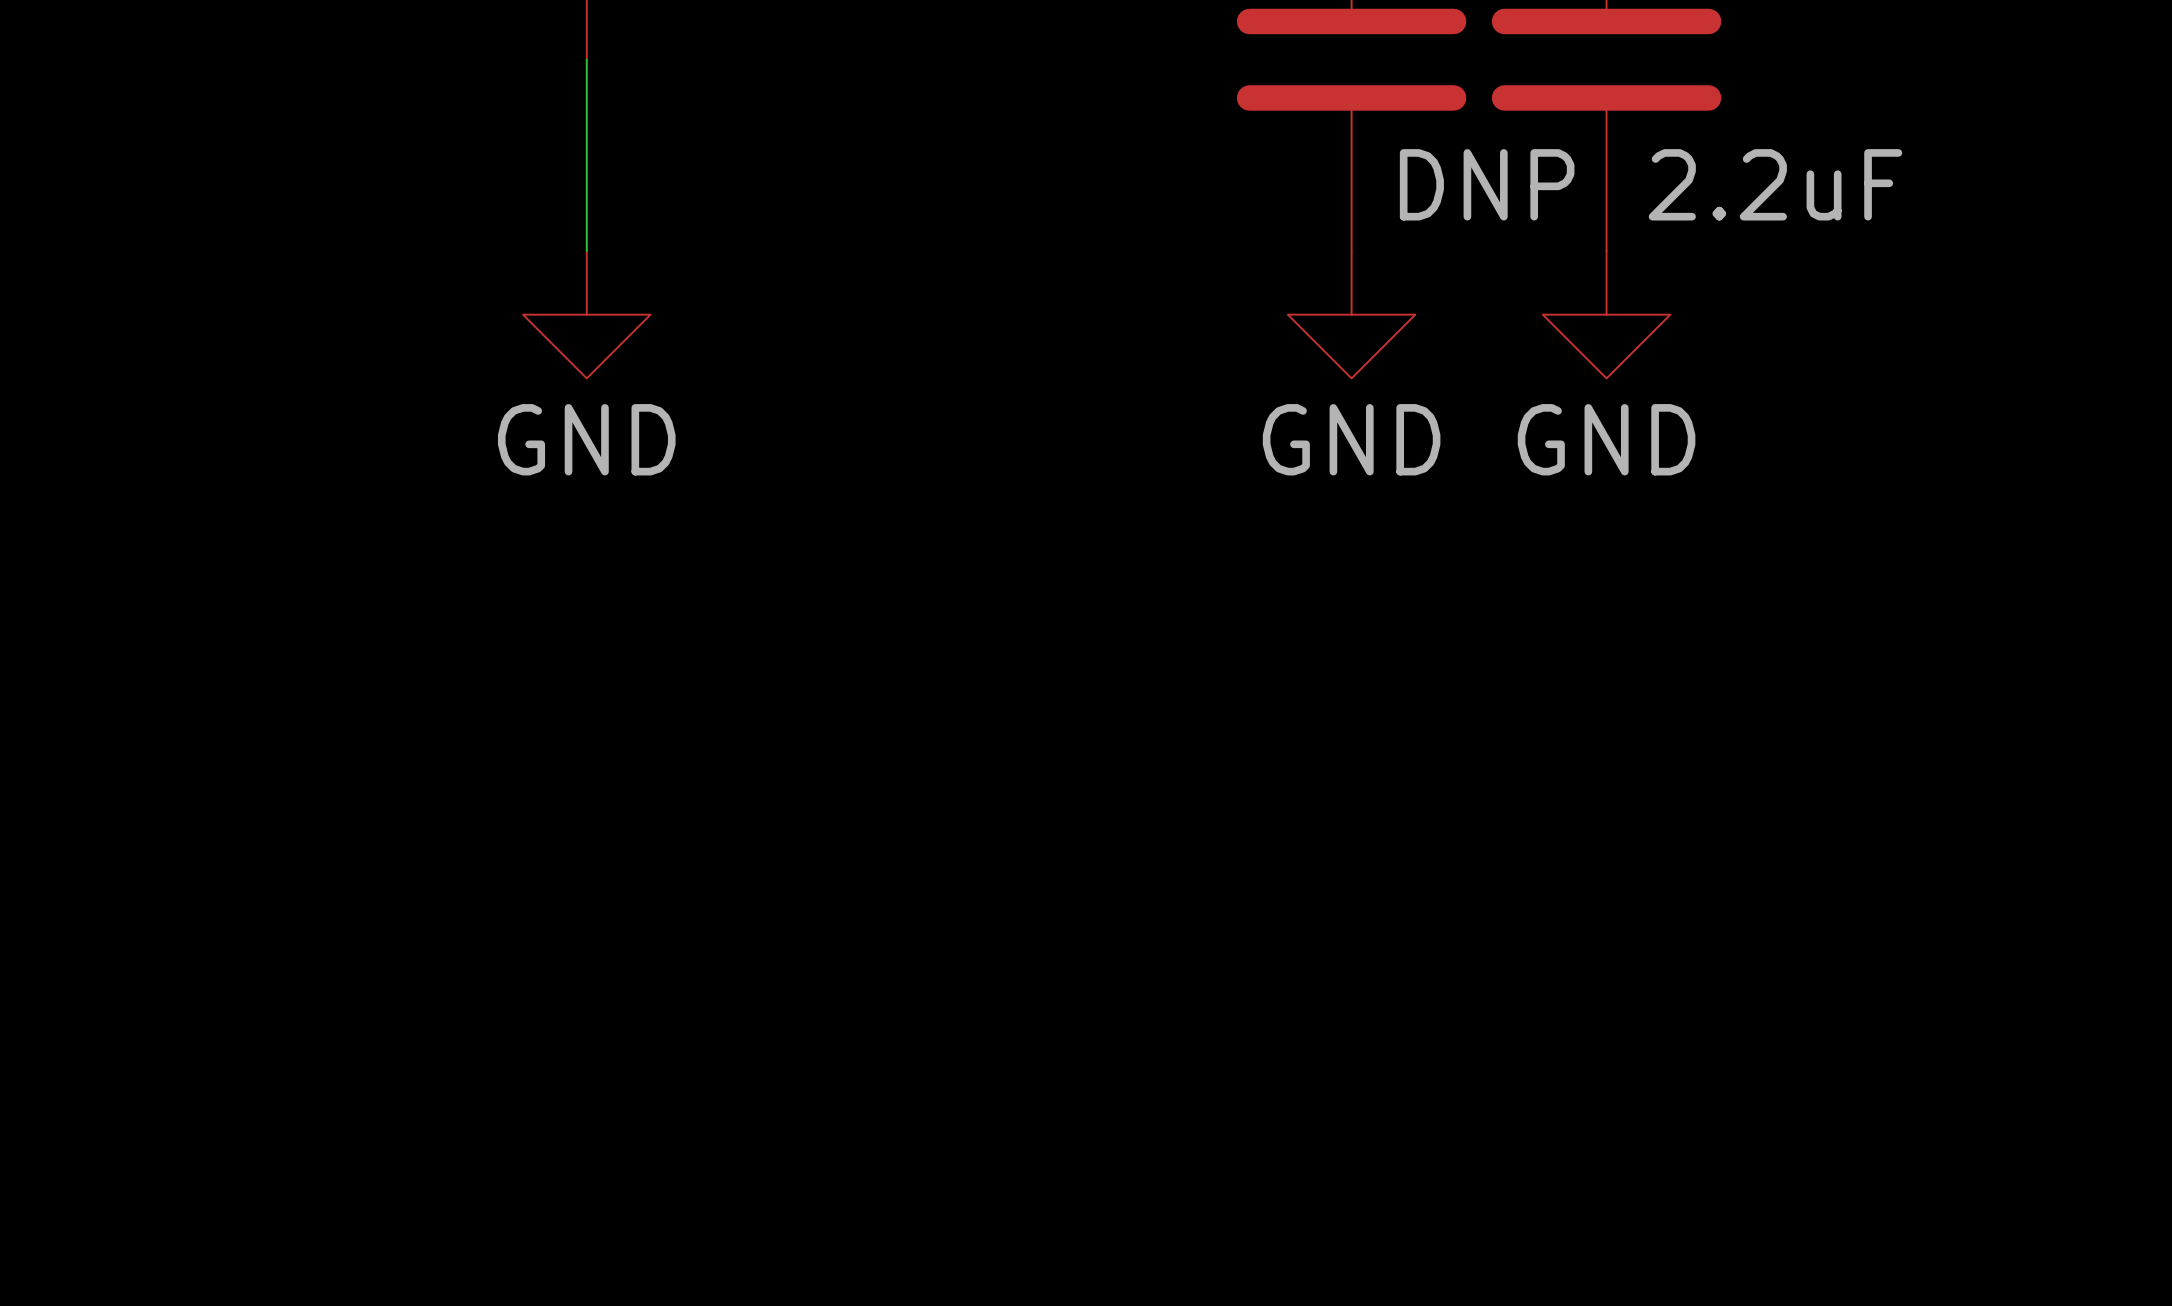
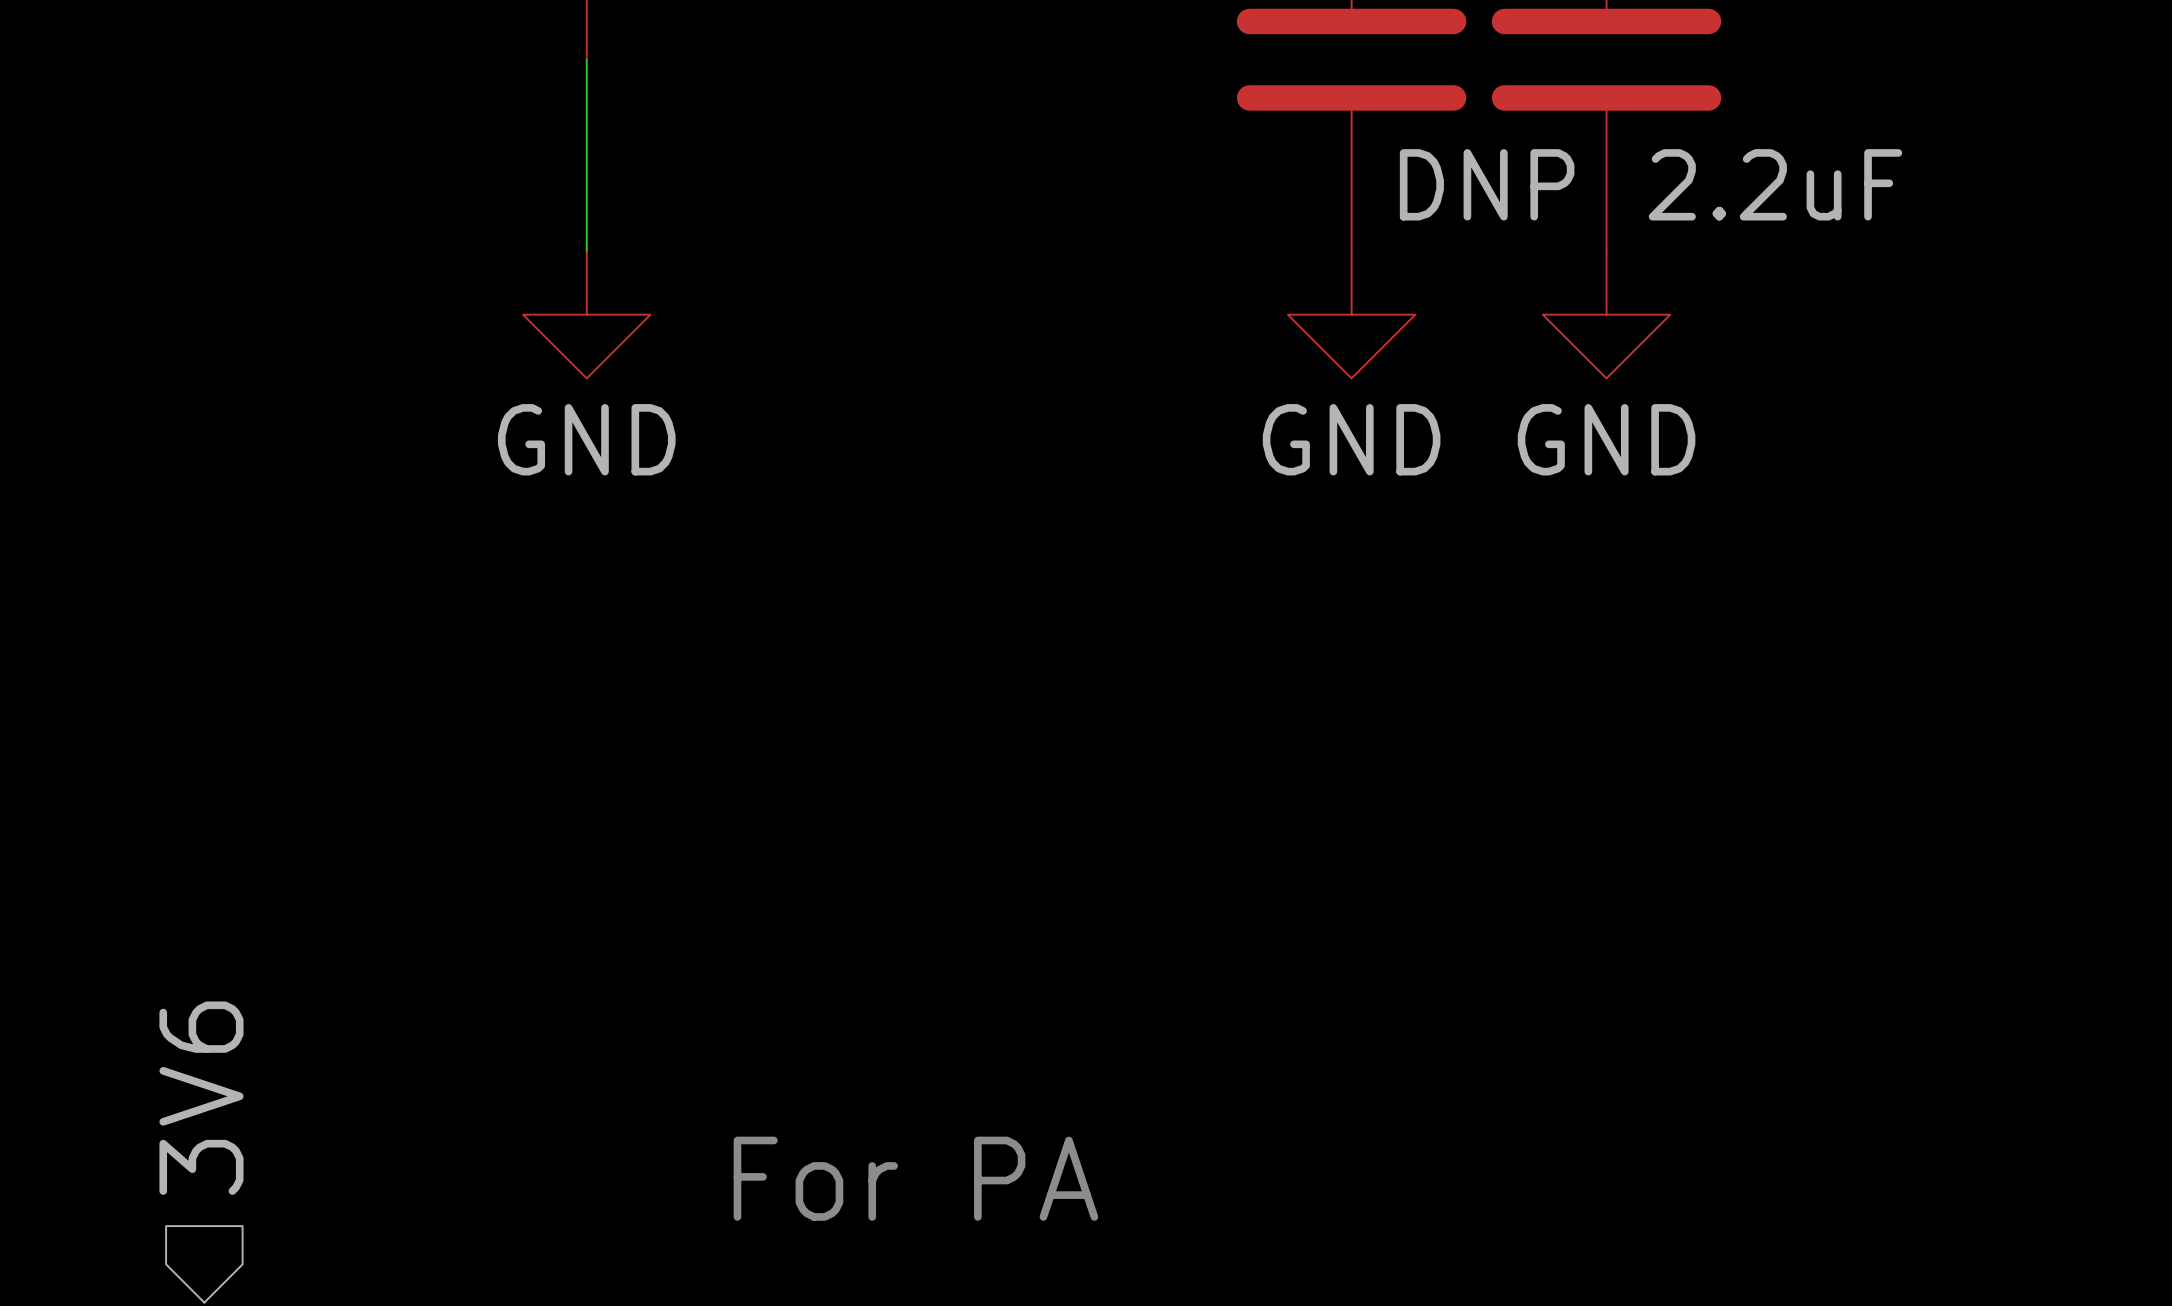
hierarchical label: none -> 3V6 (201, 1098)
text: none -> For PA (915, 1178)

